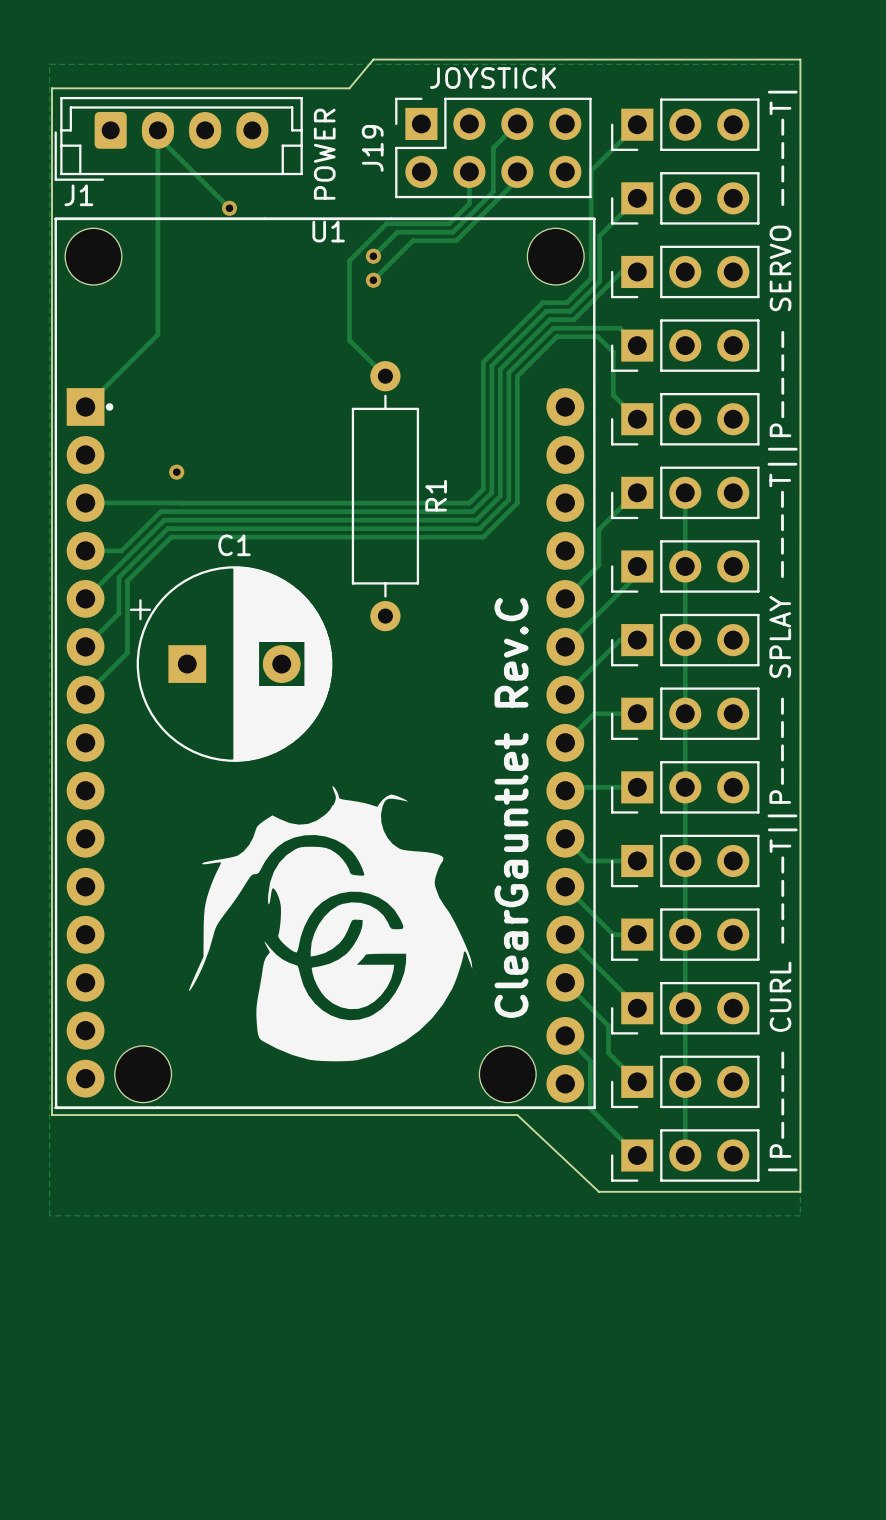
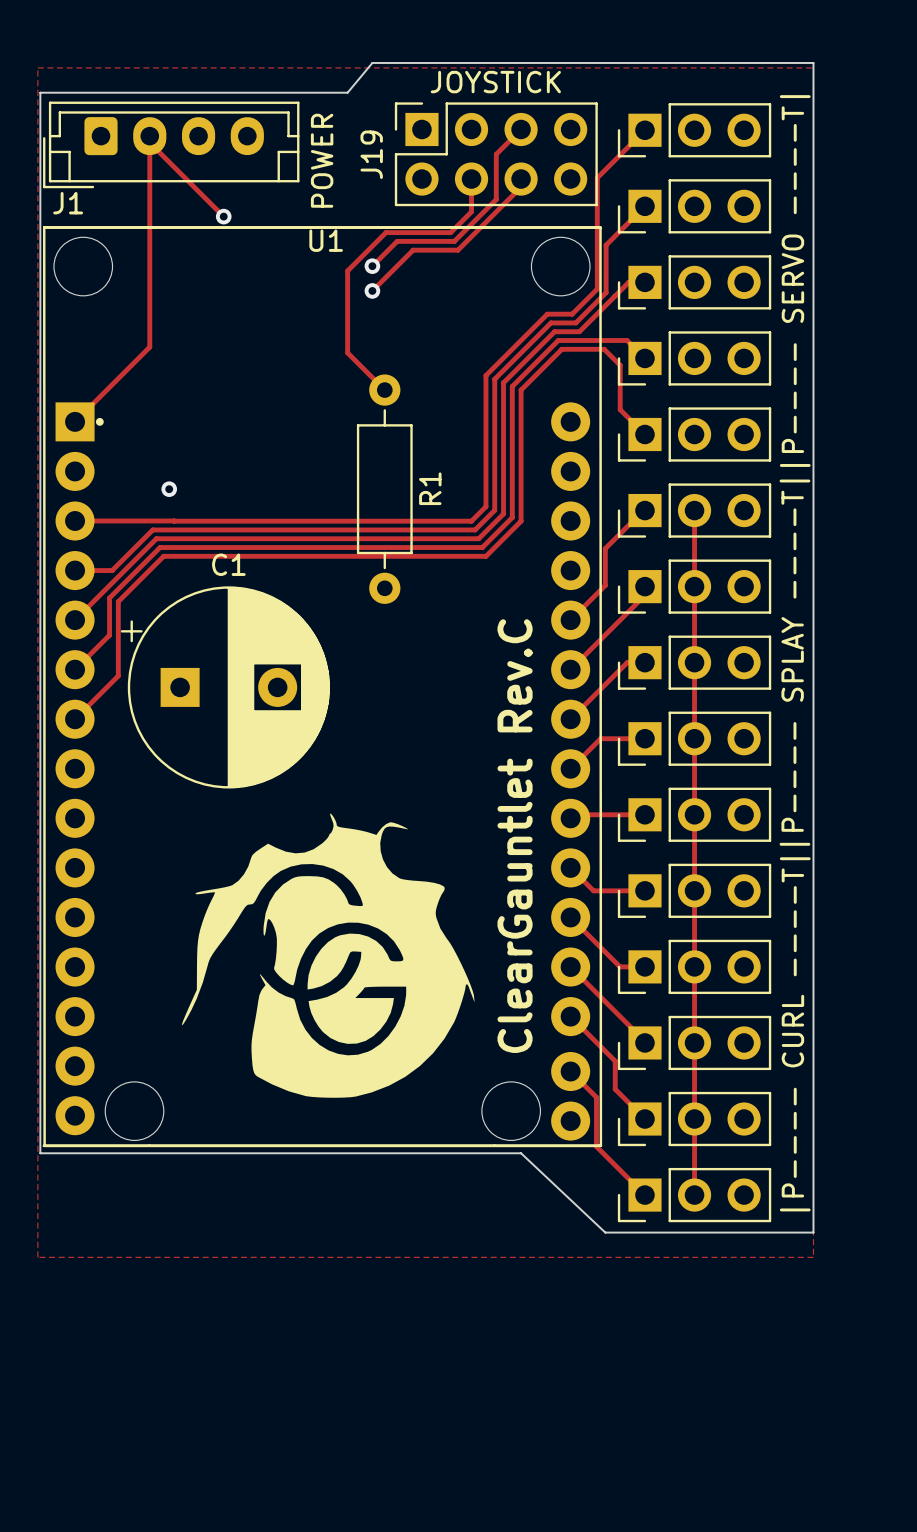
R1 footprint: [351, 361, 420, 632] -> [356, 374, 413, 604]

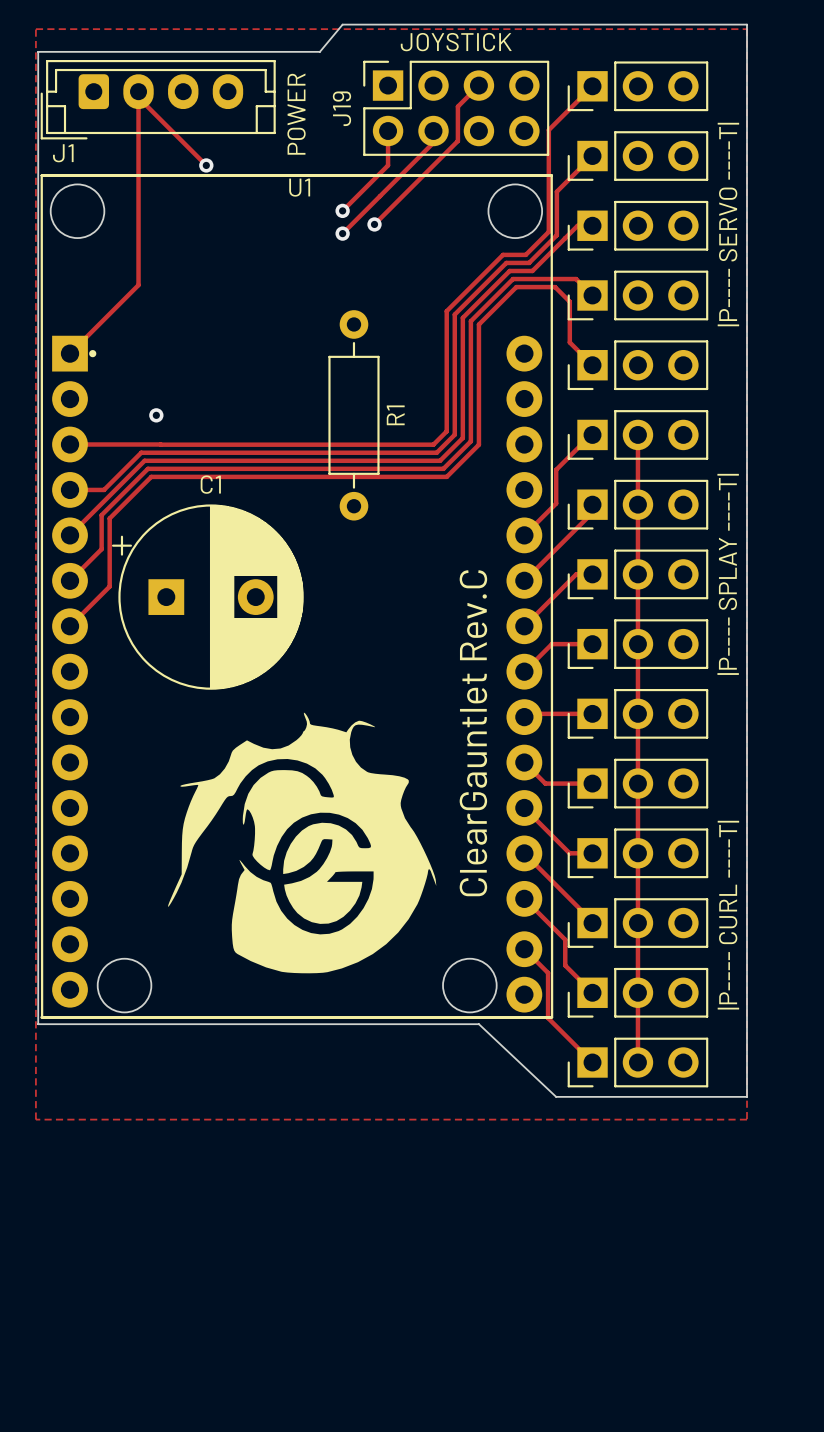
track: (498, 152) (496, 154) (496, 199) (454, 241) (397, 241) -> (457, 106) (457, 141) (374, 224)
track: none -> (388, 131) (388, 165) (365, 188)
track: (521, 179) (521, 187) (458, 250) (413, 250) -> (433, 142) (380, 196)
track: (471, 191) (471, 211) (450, 232) (385, 232) (347, 270) (347, 352) (384, 390) -> none
via: none -> (374, 224)

